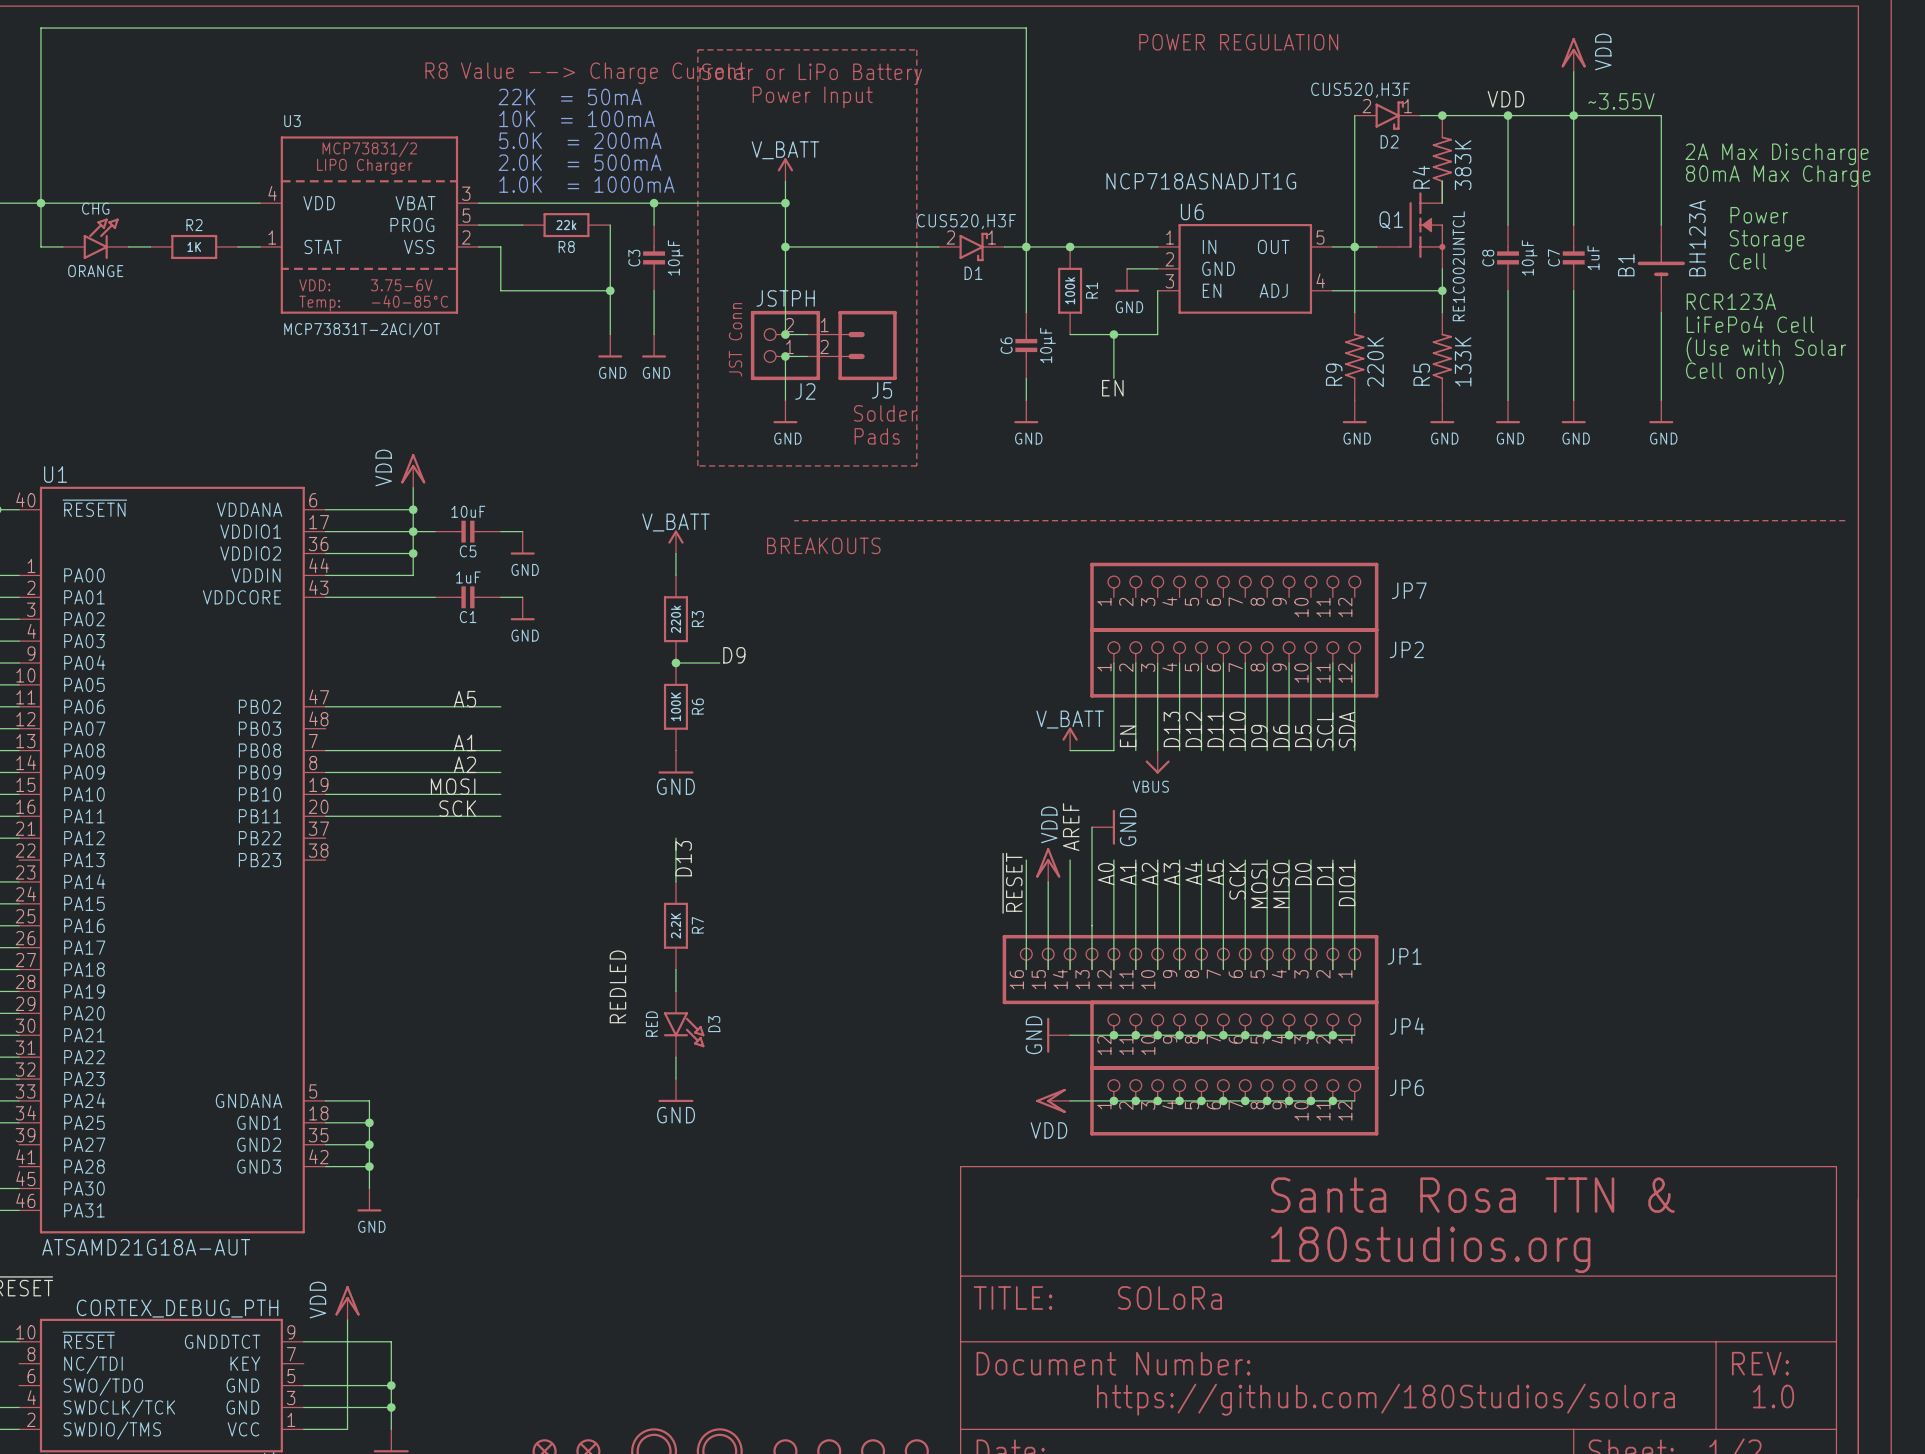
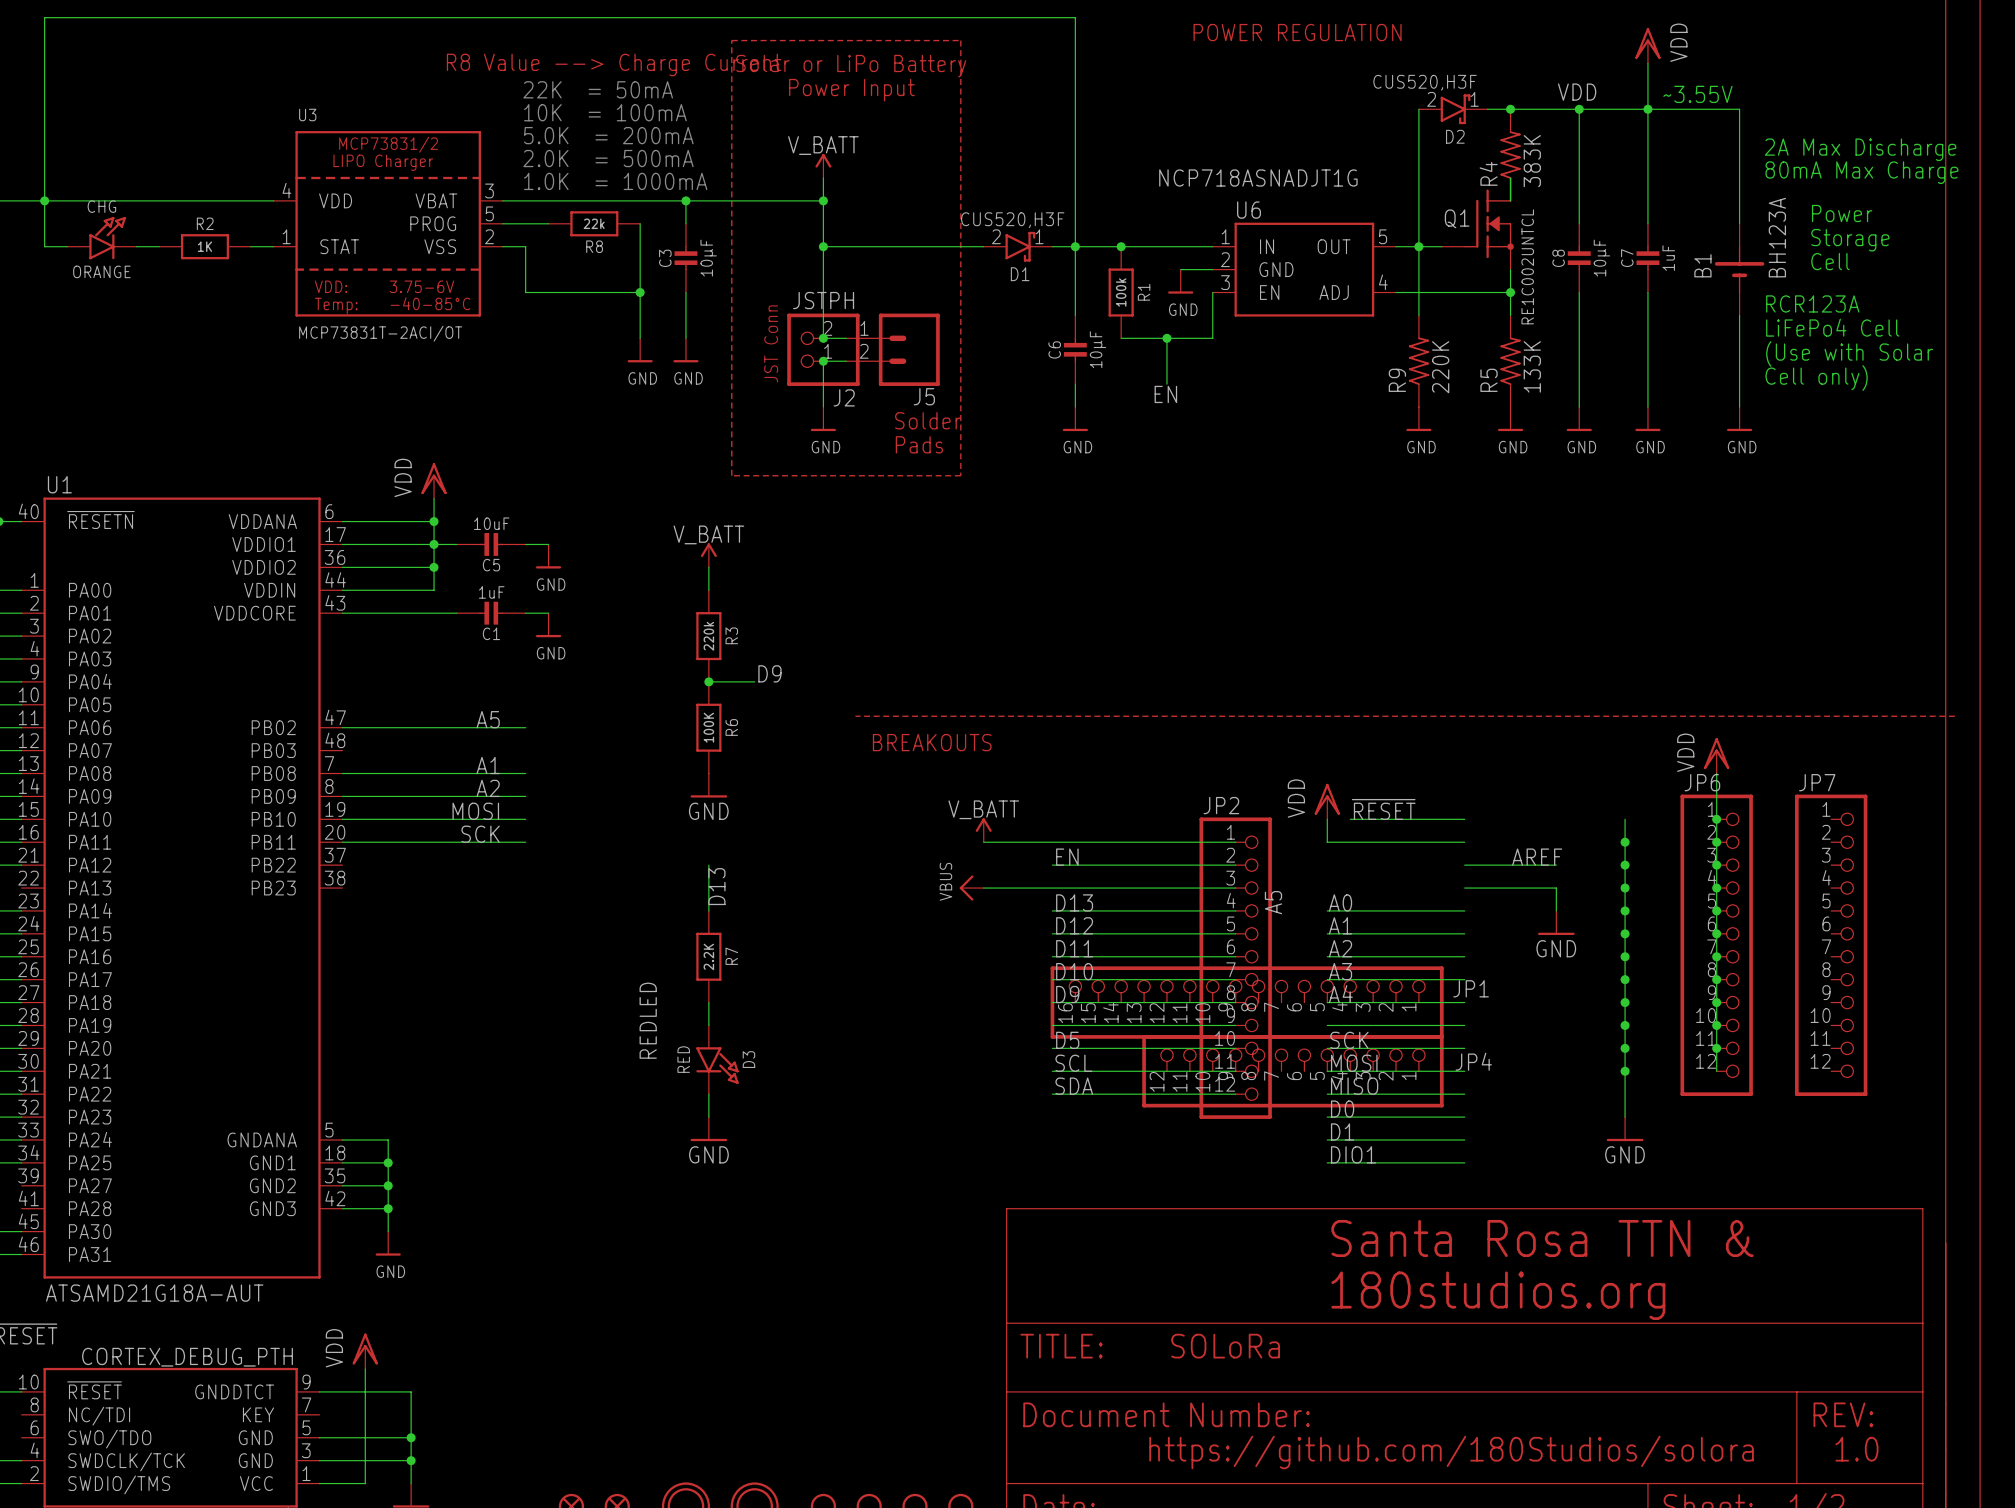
line: (794, 520) (1845, 520) -> (855, 716) (1954, 716)
text position: BREAKOUTS (823, 545) -> BREAKOUTS (932, 742)
JP7 name position: JP7 (1409, 590) -> JP7 (1817, 782)
JP7 rotation: 0° (1234, 597) -> 90° clockwise (1831, 945)
JP7 position: (1234, 597) -> (1831, 945)
JP2 name position: JP2 (1406, 649) -> JP2 (1221, 805)
wire: (1113, 663) (1113, 750) (1070, 750) -> none
wire: (1135, 663) (1135, 750) -> none
wire: (1157, 663) (1157, 750) -> none
wire: (1179, 663) (1179, 750) -> none
wire: (1201, 663) (1201, 750) -> none
wire: (1223, 663) (1223, 750) -> none
JP2 rotation: 0° (1234, 663) -> 90° clockwise (1235, 968)
JP2 position: (1234, 663) -> (1235, 968)
wire: (1245, 663) (1245, 750) -> none
wire: (1267, 663) (1267, 750) -> none
wire: (1289, 663) (1289, 750) -> none
wire: (1310, 663) (1310, 750) -> none
wire: (1332, 663) (1332, 750) -> none
wire: (1354, 663) (1354, 750) -> none
label: D13 (1171, 729) -> none
label: D12 (1193, 729) -> none
label: D11 (1215, 729) -> none
label: D10 (1237, 729) -> none
label: SDA (1347, 729) -> none
label: SCL (1325, 730) -> none
power symbol: none -> VDD (1716, 755)
label: D9 (1259, 735) -> none
label: D6 (1281, 735) -> none
label: D5 (1303, 735) -> none
label rotation: 0° (1128, 736) -> 90° clockwise (1067, 857)
label position: EN (1128, 736) -> EN (1067, 857)
power symbol position: V_BATT (1070, 739) -> V_BATT (983, 830)
wire: none -> (1716, 773) (1716, 1071)
power symbol: VBUS (1157, 762) -> none
power symbol: none -> VDD (1327, 801)
label: none -> ~{RESET} (1383, 809)
wire: none -> (1327, 819) (1327, 842) (1464, 842)
wire: none -> (1350, 819) (1464, 819)
wire: none -> (1625, 819) (1625, 1117)
junction: none -> (1716, 819)
wire: none -> (983, 842) (1235, 842)
junction: none -> (1625, 842)
junction: none -> (1716, 842)
label: AREF (1071, 827) -> none
wire: (1091, 827) (1091, 969) -> none
power symbol: GND (1103, 827) -> none
label: none -> AREF (1537, 857)
wire: none -> (1052, 865) (1235, 865)
wire: none -> (1464, 865) (1556, 865)
junction: none -> (1625, 865)
junction: none -> (1716, 865)
power symbol: none -> VBUS (971, 888)
wire: none -> (983, 888) (1235, 888)
wire: (1070, 860) (1070, 969) -> none
wire: (1113, 860) (1113, 969) -> none
wire: (1135, 860) (1135, 969) -> none
wire: (1157, 860) (1157, 969) -> none
wire: (1179, 860) (1179, 969) -> (1052, 1002) (1235, 1002)
wire: (1201, 860) (1201, 969) -> none
wire: (1223, 860) (1223, 969) -> none
wire: (1245, 860) (1245, 969) -> none
wire: (1267, 860) (1267, 969) -> (1464, 1002) (1327, 1002)
wire: (1289, 860) (1289, 969) -> none
wire: (1310, 860) (1310, 969) -> none
wire: (1332, 860) (1332, 969) -> none
wire: (1354, 860) (1354, 969) -> none
wire: none -> (1464, 888) (1556, 888) (1556, 910)
junction: none -> (1625, 888)
junction: none -> (1716, 888)
power symbol: VDD (1048, 864) -> none
label rotation: 0° (1193, 873) -> 90° clockwise (1340, 994)
label position: A4 (1193, 873) -> A4 (1340, 994)
label: none -> D13 (1074, 902)
label rotation: 0° (1106, 874) -> 90° clockwise (1340, 902)
label position: A0 (1106, 874) -> A0 (1340, 902)
label rotation: 0° (1128, 874) -> 90° clockwise (1340, 925)
label position: A1 (1128, 874) -> A1 (1340, 925)
label rotation: 0° (1150, 874) -> 90° clockwise (1340, 948)
label position: A2 (1150, 874) -> A2 (1340, 948)
label rotation: 0° (1171, 874) -> 90° clockwise (1340, 971)
label position: A3 (1171, 874) -> A3 (1340, 971)
label: D0 (1303, 874) -> none
label: D1 (1325, 874) -> none
wire: none -> (1052, 910) (1235, 910)
wire: (1048, 881) (1048, 969) -> none
label rotation: 0° (1237, 881) -> 90° clockwise (1349, 1040)
label position: SCK (1237, 881) -> SCK (1349, 1040)
wire: none -> (1327, 910) (1464, 910)
junction: none -> (1625, 910)
junction: none -> (1716, 910)
label: ~{RESET} (1012, 883) -> none
label: DIO1 (1347, 884) -> none
label rotation: 0° (1259, 885) -> 90° clockwise (1354, 1063)
label position: MOSI (1259, 885) -> MOSI (1354, 1063)
label rotation: 0° (1281, 885) -> 90° clockwise (1354, 1086)
label position: MISO (1281, 885) -> MISO (1354, 1086)
power symbol: none -> GND (1556, 922)
label: none -> D12 (1074, 925)
wire: none -> (1052, 933) (1235, 933)
wire: none -> (1327, 933) (1464, 933)
junction: none -> (1625, 933)
junction: none -> (1716, 933)
label: none -> D11 (1074, 948)
wire: none -> (1052, 956) (1235, 956)
wire: none -> (1327, 956) (1464, 956)
junction: none -> (1625, 956)
junction: none -> (1716, 956)
label: none -> D10 (1074, 971)
wire: none -> (1052, 979) (1235, 979)
wire: none -> (1327, 979) (1464, 979)
junction: none -> (1625, 979)
junction: none -> (1716, 979)
label: none -> D9 (1067, 994)
junction: none -> (1625, 1002)
junction: none -> (1716, 1002)
wire: none -> (1052, 1025) (1235, 1025)
wire: none -> (1327, 1025) (1464, 1025)
junction: none -> (1625, 1025)
junction: none -> (1716, 1025)
label: none -> D5 (1067, 1040)
wire: none -> (1052, 1048) (1235, 1048)
wire: none -> (1327, 1048) (1464, 1048)
junction: none -> (1625, 1048)
junction: none -> (1716, 1048)
label: none -> SCL (1073, 1063)
wire: none -> (1052, 1071) (1121, 1071)
power symbol: GND (1058, 1035) -> none
junction: (1113, 1035) -> none
junction: (1135, 1035) -> none
junction: (1157, 1035) -> none
wire: (1179, 1035) (1267, 1035) -> none
junction: (1179, 1035) -> none
junction: (1201, 1035) -> none
junction: (1223, 1035) -> none
junction: (1245, 1035) -> none
junction: (1267, 1035) -> none
junction: (1289, 1035) -> none
junction: (1310, 1035) -> none
junction: (1332, 1035) -> none
wire: none -> (1418, 1071) (1464, 1071)
junction: none -> (1625, 1071)
label: none -> SDA (1074, 1086)
wire: none -> (1052, 1094) (1235, 1094)
wire: none -> (1327, 1094) (1464, 1094)
label: none -> D0 (1342, 1109)
wire: none -> (1327, 1117) (1464, 1117)
JP6 name position: JP6 (1406, 1087) -> JP6 (1702, 782)
power symbol: none -> GND (1625, 1129)
label: none -> D1 (1342, 1131)
power symbol: VDD (1053, 1100) -> none
wire: (1070, 1100) (1267, 1100) -> none
junction: (1113, 1100) -> none
junction: (1135, 1100) -> none
junction: (1157, 1100) -> none
junction: (1179, 1100) -> none
junction: (1201, 1100) -> none
junction: (1223, 1100) -> none
JP6 rotation: 0° (1234, 1100) -> 90° clockwise (1716, 945)
JP6 position: (1234, 1100) -> (1716, 945)
junction: (1245, 1100) -> none
junction: (1267, 1100) -> none
junction: (1289, 1100) -> none
junction: (1310, 1100) -> none
junction: (1332, 1100) -> none
wire: none -> (1418, 1139) (1464, 1139)
label: none -> DIO1 (1353, 1154)
wire: none -> (1327, 1162) (1464, 1162)

